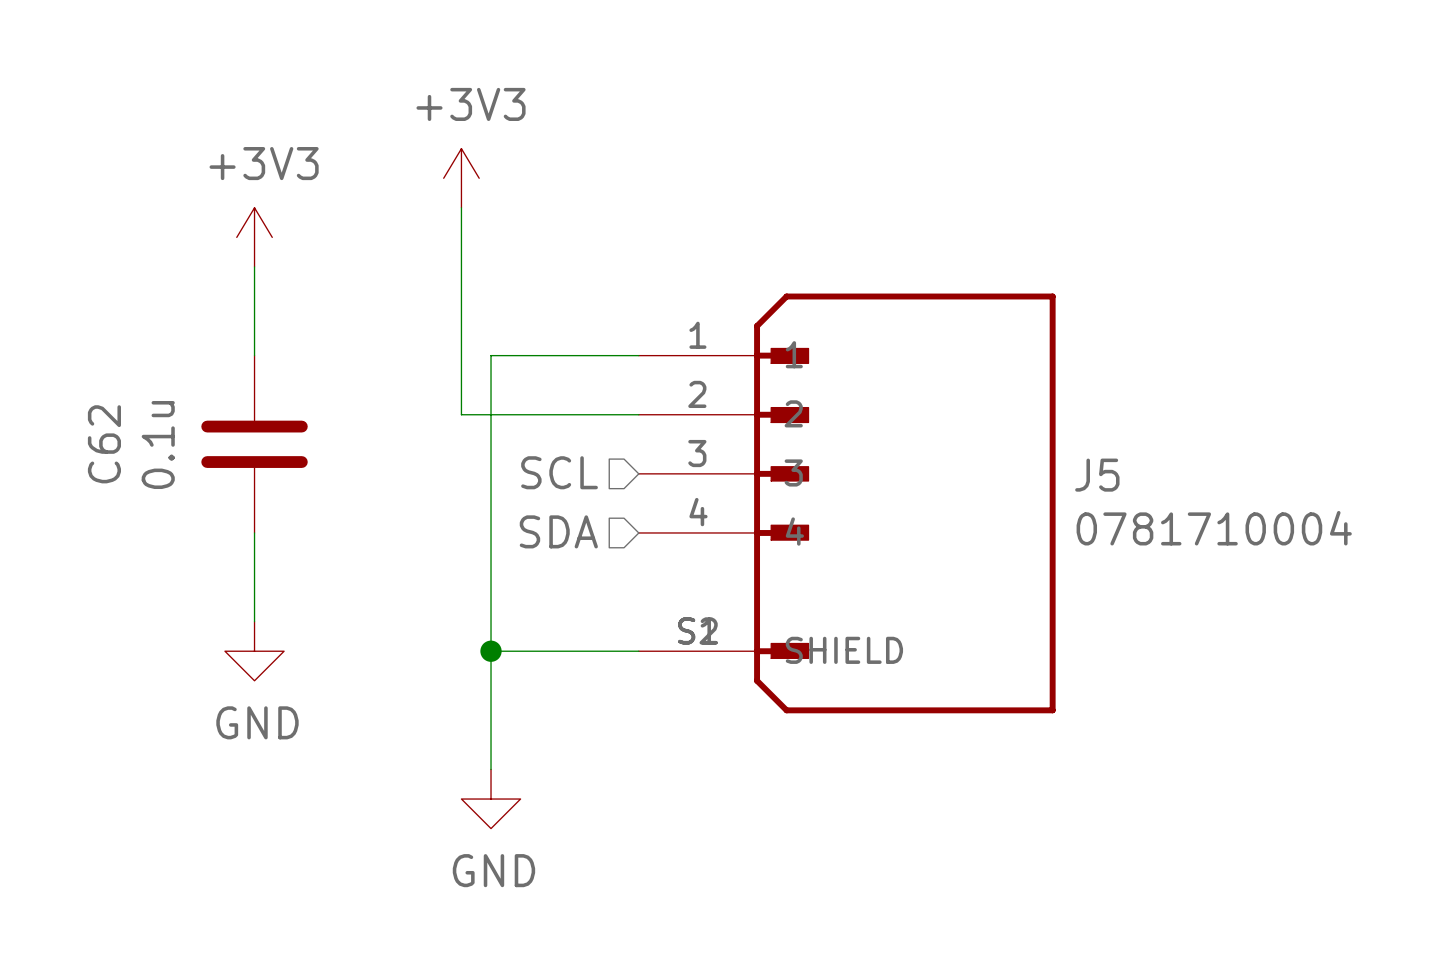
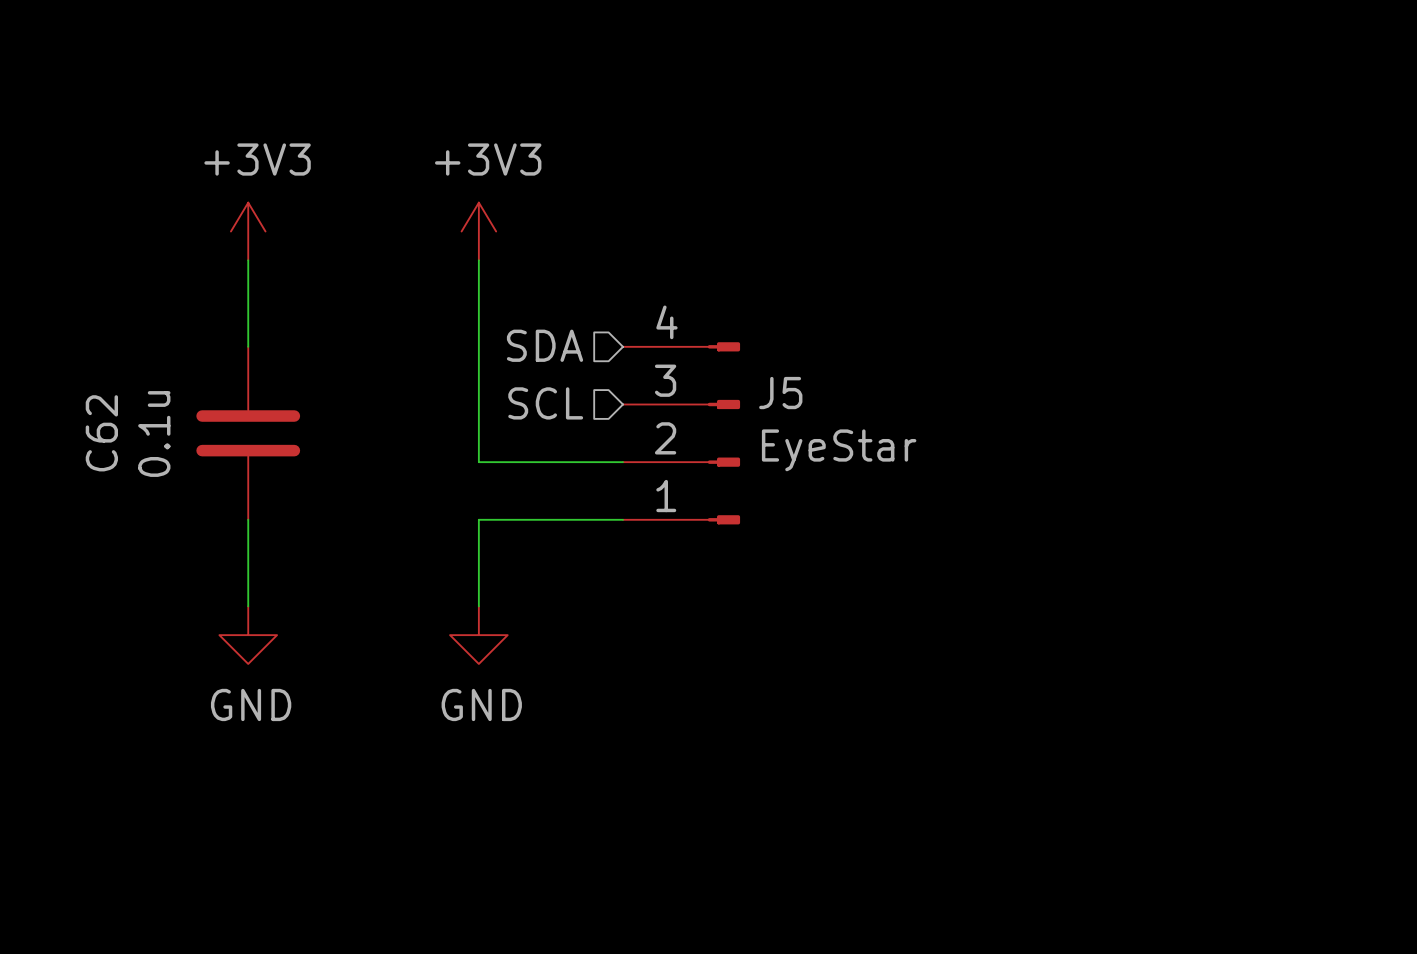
power symbol position: +3V3 (461, 178) -> +3V3 (478, 231)
wire: (461, 207) (461, 414) (638, 414) -> none
J5 symbol: [638, 293, 1056, 714] -> [623, 342, 741, 525]
wire: (491, 355) (638, 355) -> (478, 346) (478, 260)
hierarchical label position: SCL (559, 472) -> SCL (545, 403)
wire: (491, 473) (491, 532) -> (478, 462) (623, 462)
J5 name position: J5 (1097, 475) -> J5 (780, 393)
J5 value: 0781710004 (1214, 528) -> EyeStar (839, 450)
hierarchical label position: SDA (558, 531) -> SDA (545, 345)
wire: (491, 621) (491, 769) -> none
wire: (491, 651) (638, 651) -> (478, 519) (623, 519)
junction: (491, 651) -> none
power symbol position: GND (491, 799) -> GND (478, 635)

